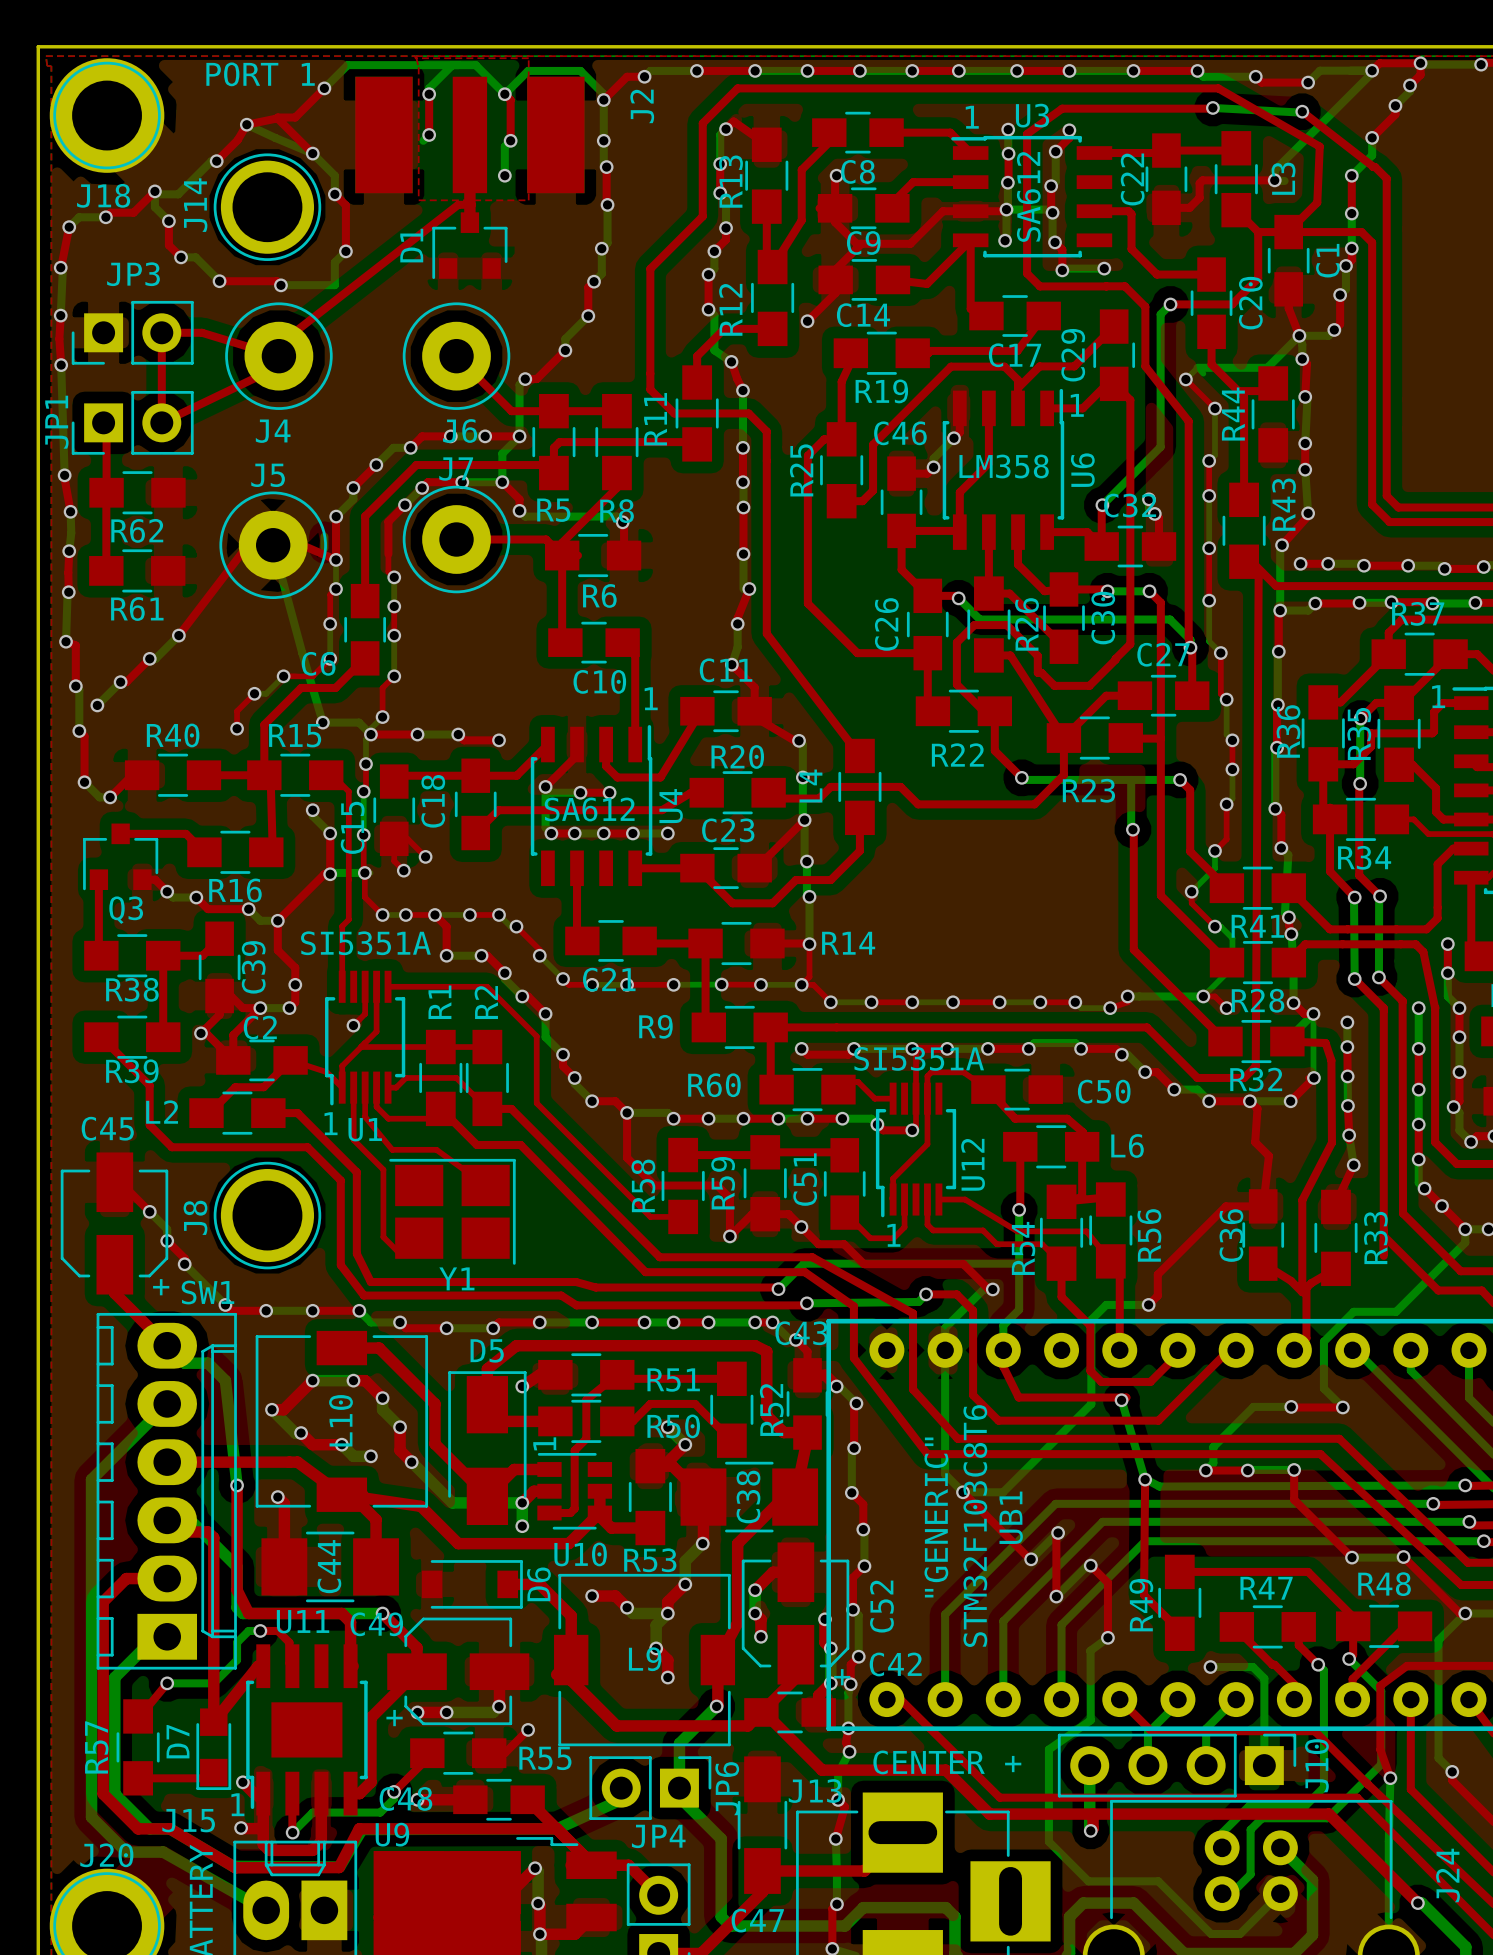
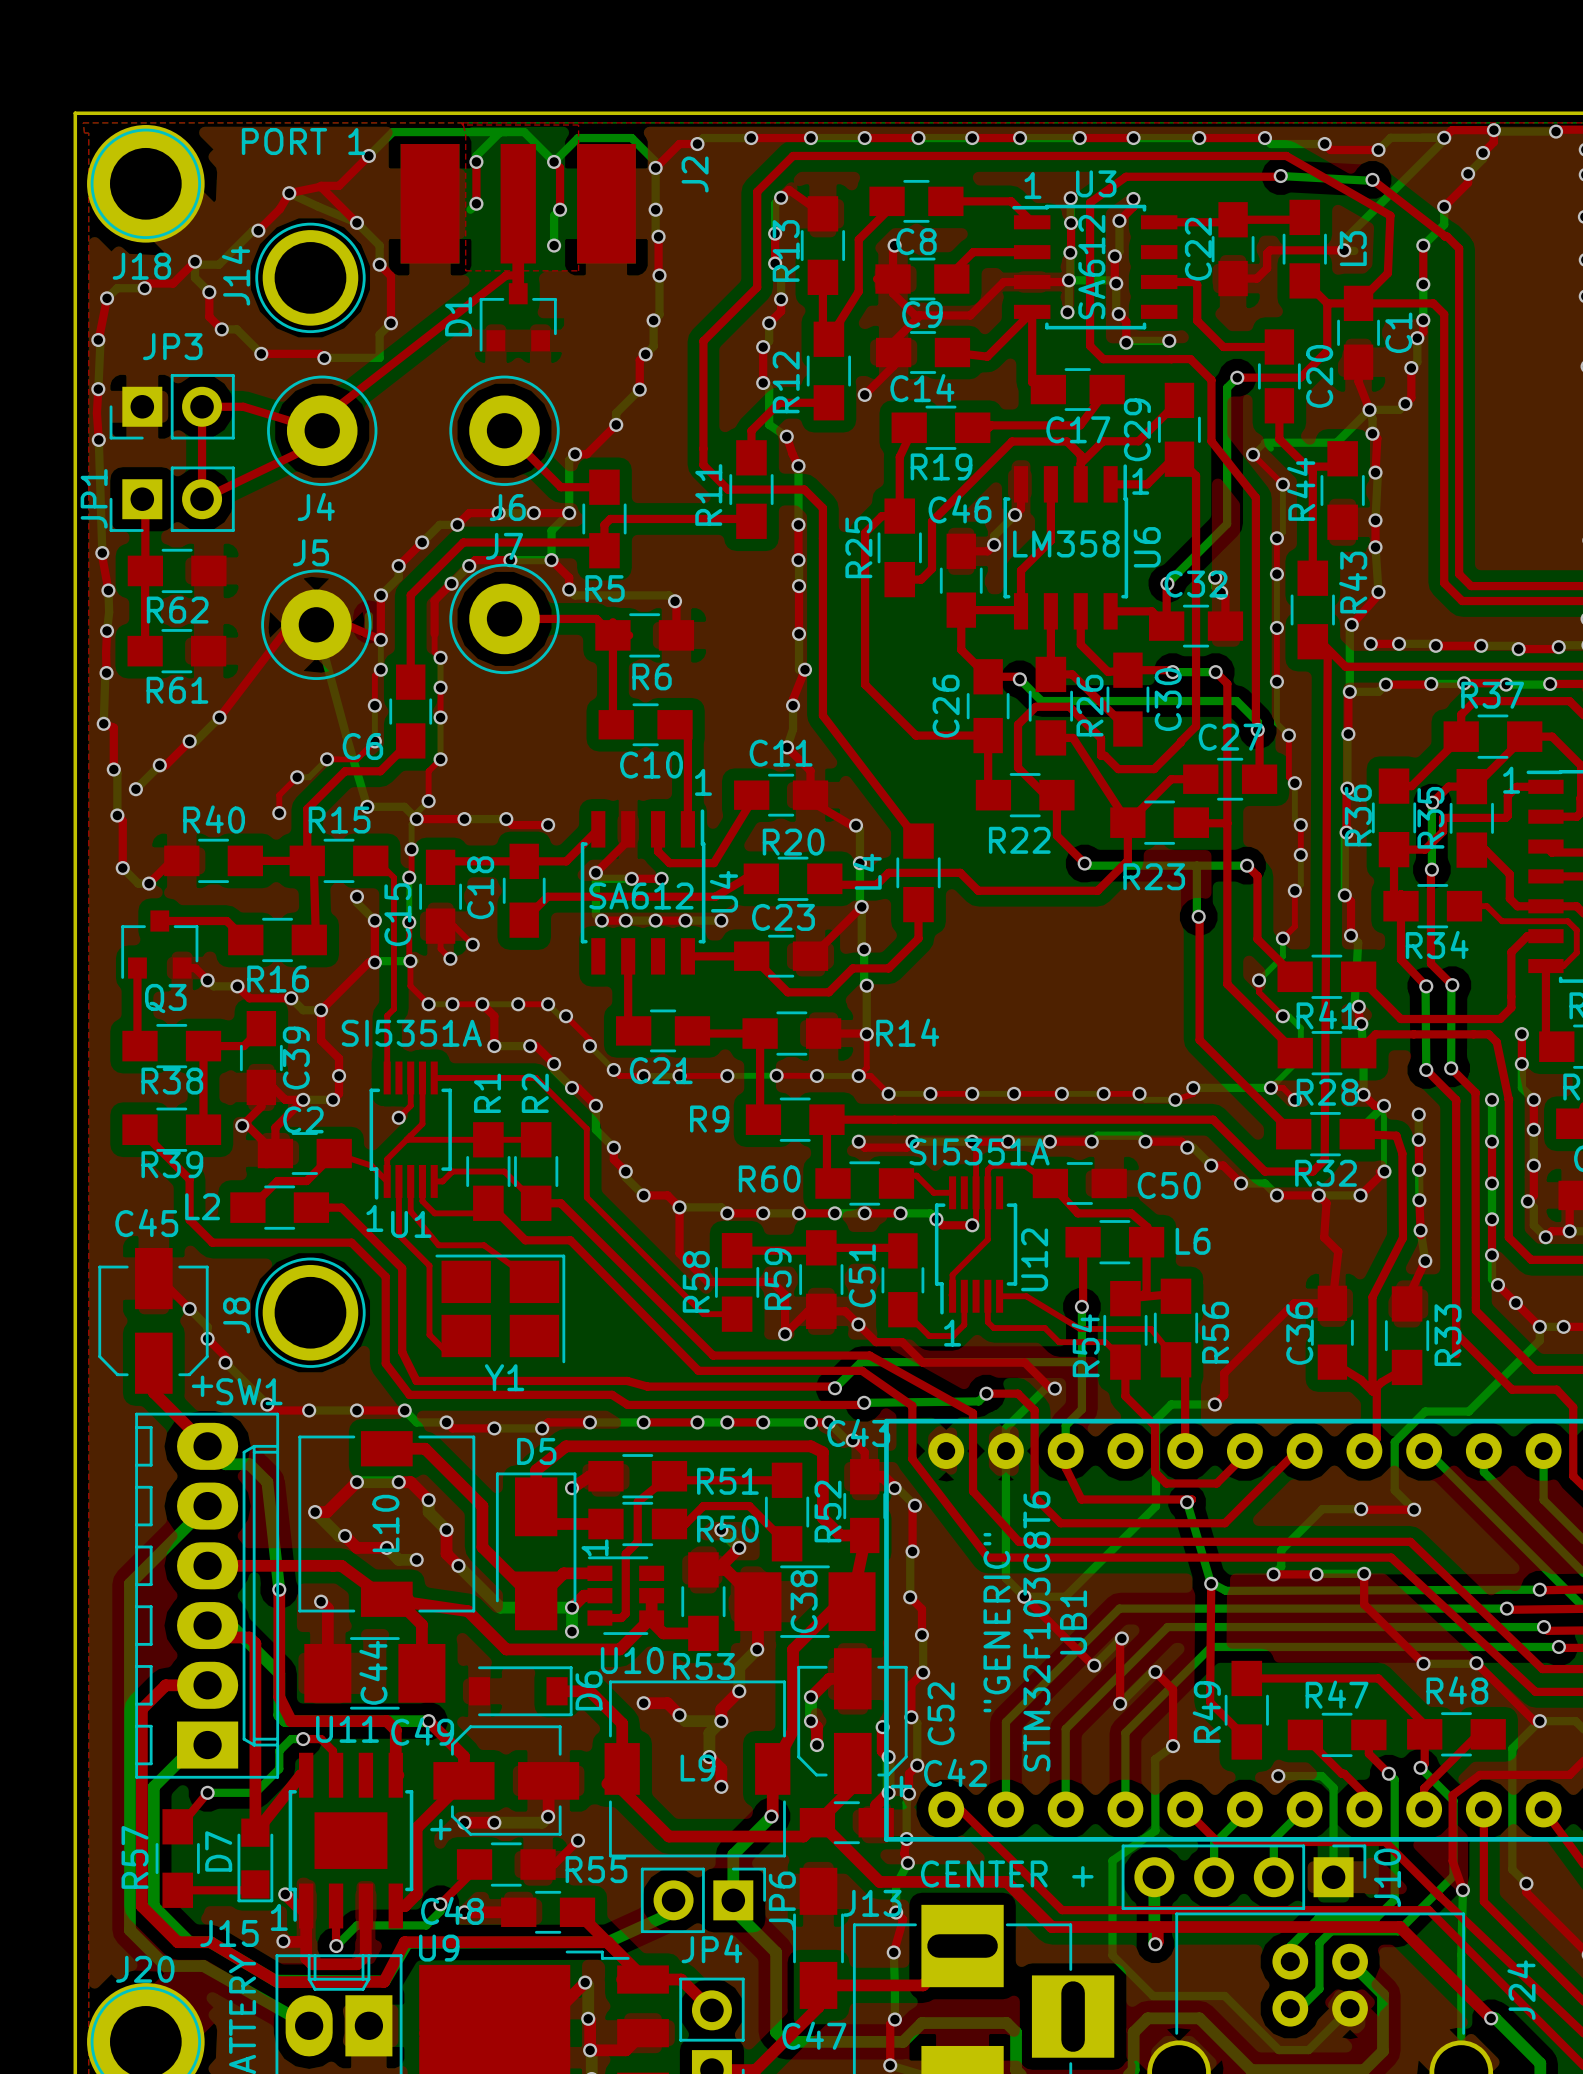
top track: (553, 411) (616, 411) -> none
R8: (616, 442) -> none
top track: (616, 473) (616, 487) (562, 542) -> none

